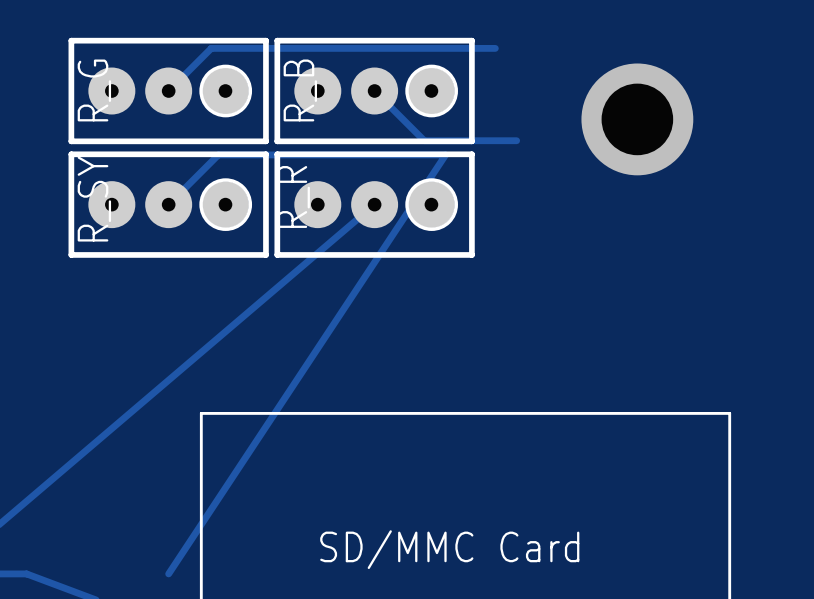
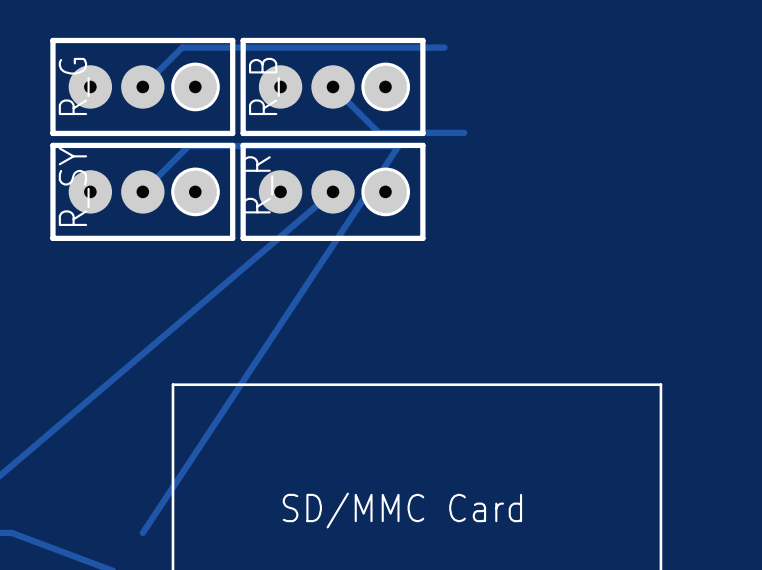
via: (637, 119) -> none

